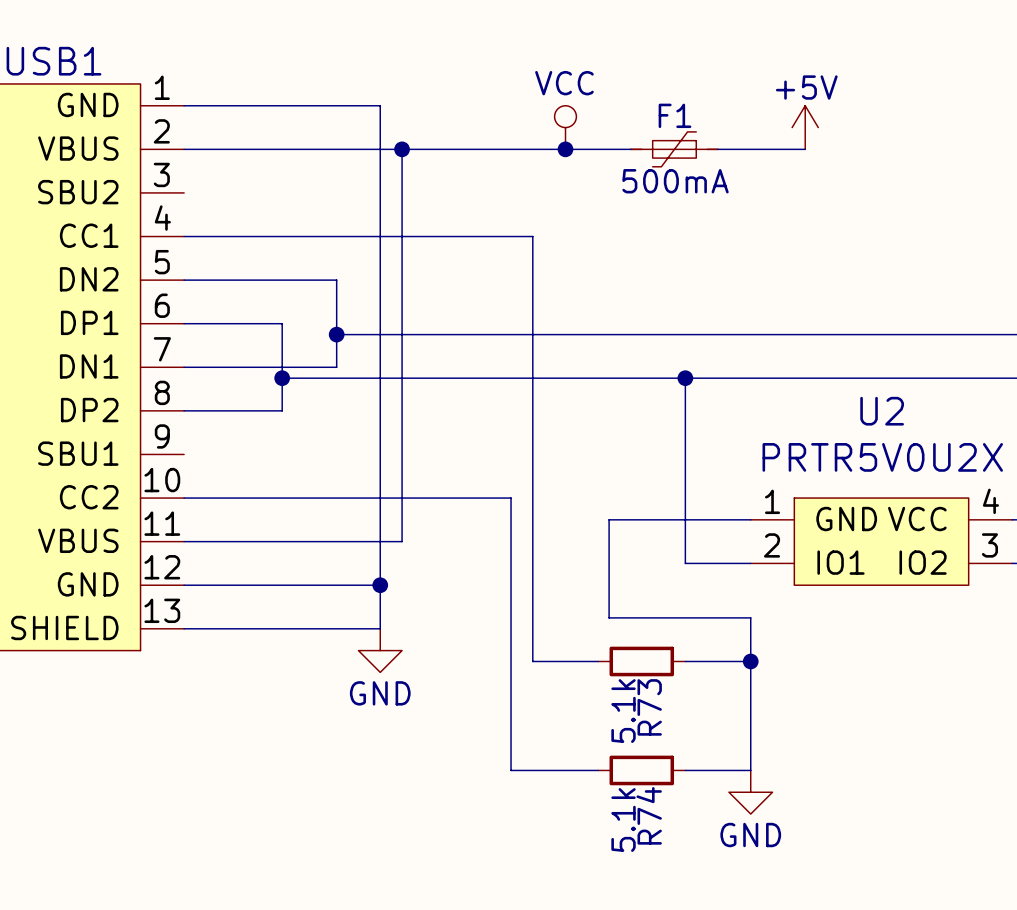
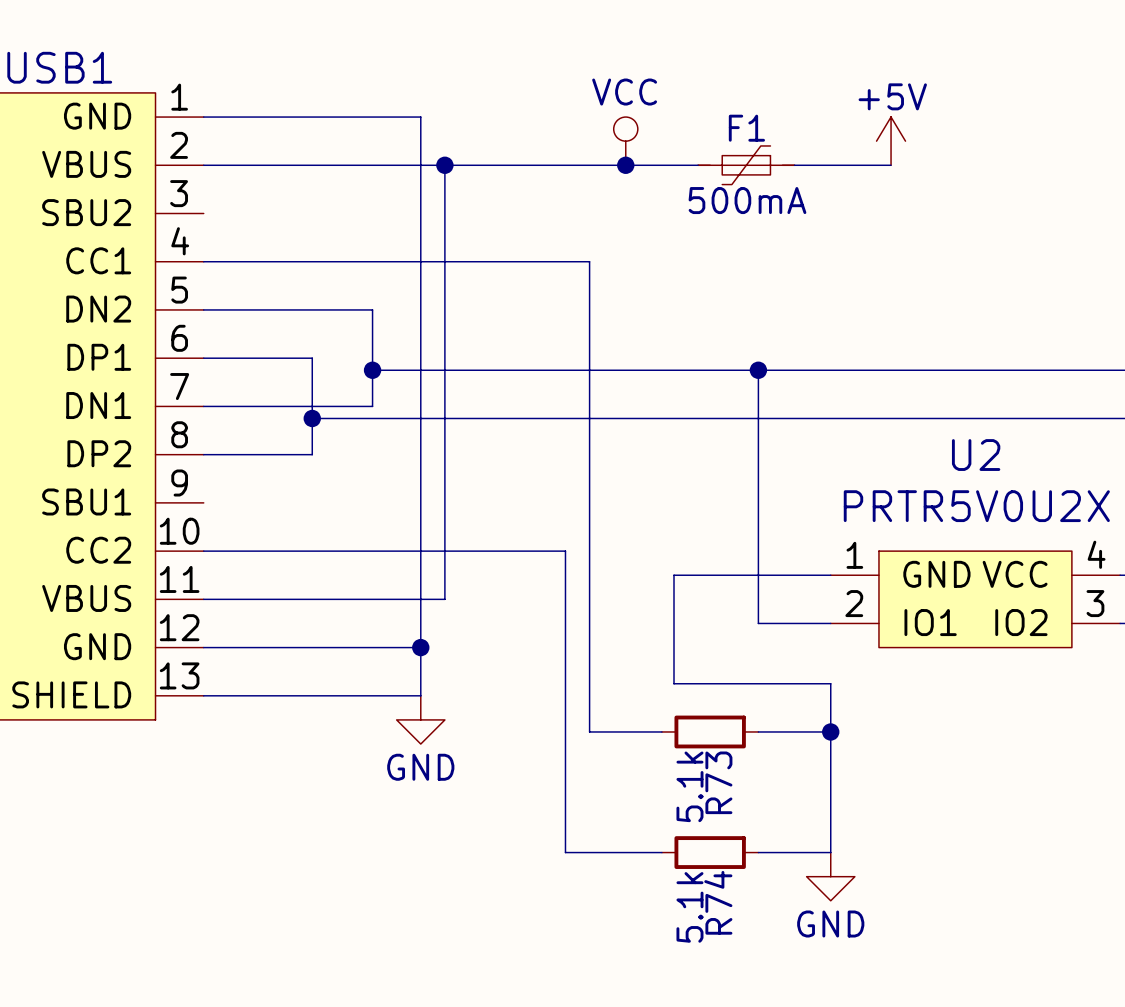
wire: none -> (758, 370) (758, 418)
junction position: (685, 378) -> (758, 370)

